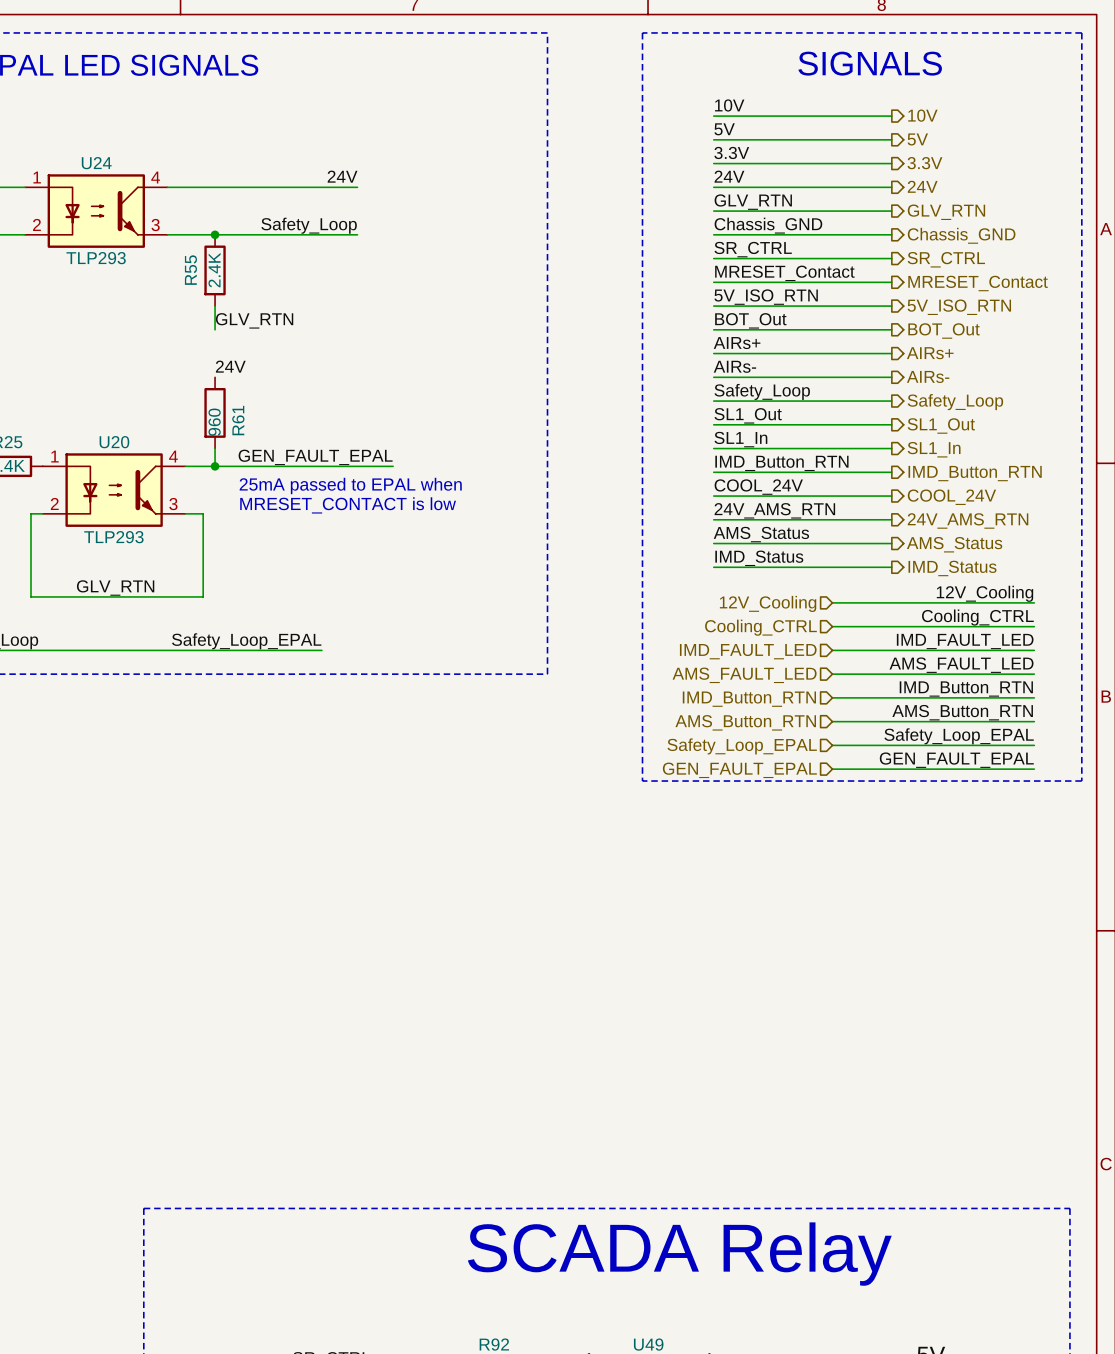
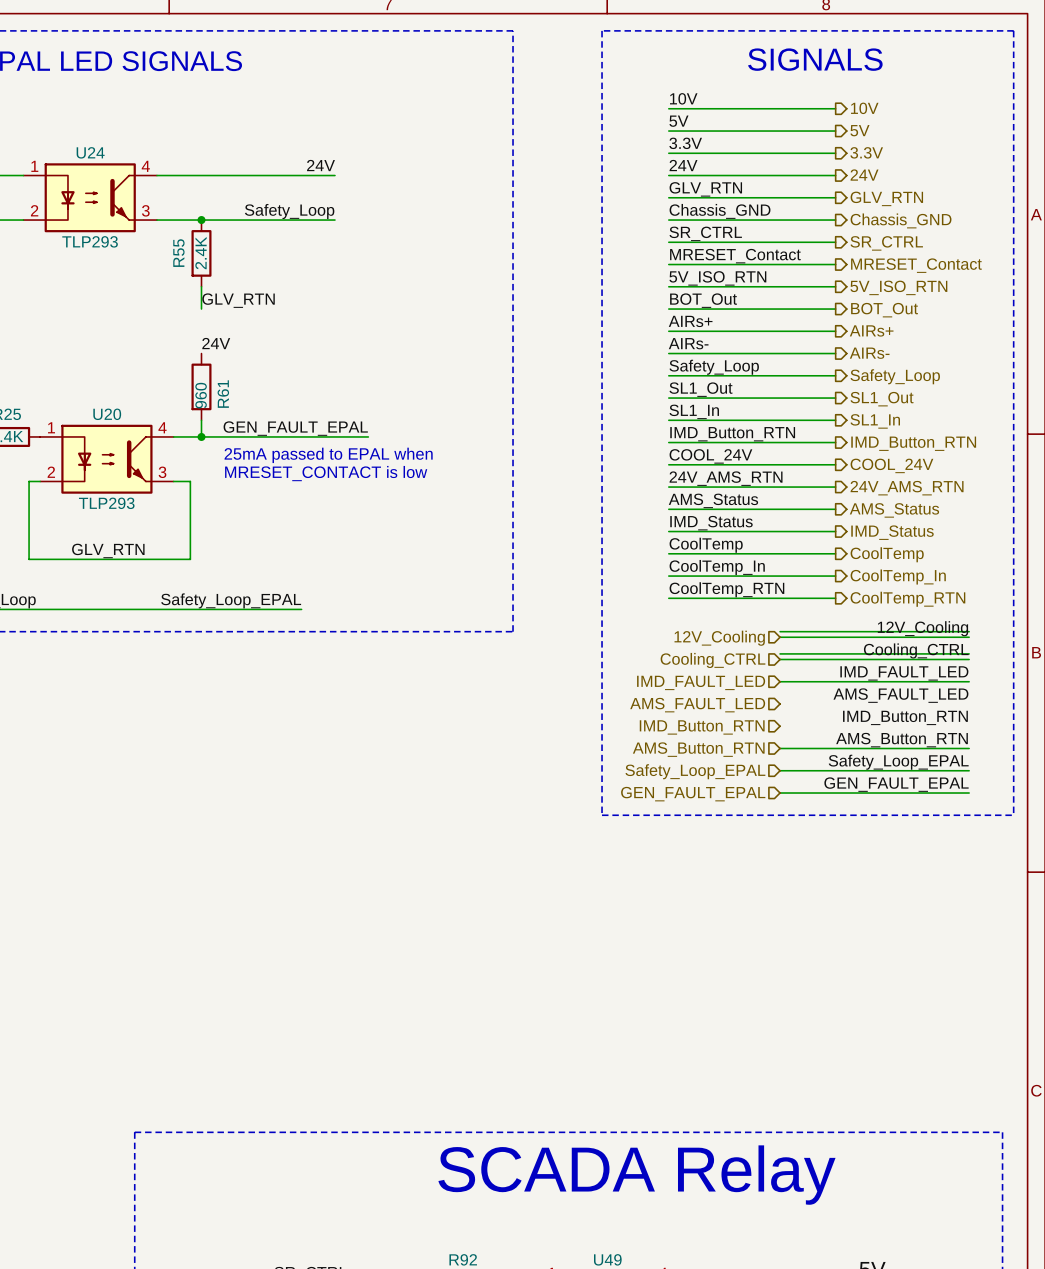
label: none -> CoolTemp (706, 545)
wire: none -> (668, 553) (835, 553)
hierarchical label: none -> CoolTemp (887, 554)
label position: 12V_Cooling (985, 593) -> 12V_Cooling (922, 628)
wire: (832, 602) (1034, 602) -> (780, 637) (969, 637)
hierarchical label position: 12V_Cooling (768, 603) -> 12V_Cooling (719, 638)
label: none -> CoolTemp_In (717, 567)
wire: none -> (668, 576) (835, 576)
hierarchical label: none -> CoolTemp_In (898, 577)
label position: Cooling_CTRL (977, 617) -> Cooling_CTRL (916, 650)
wire: (832, 626) (1034, 626) -> (780, 659) (969, 659)
hierarchical label position: Cooling_CTRL (760, 627) -> Cooling_CTRL (713, 660)
label: none -> CoolTemp_RTN (726, 589)
wire: none -> (668, 598) (835, 598)
hierarchical label: none -> CoolTemp_RTN (907, 599)
label position: IMD_FAULT_LED (965, 641) -> IMD_FAULT_LED (904, 673)
wire: (832, 650) (1034, 650) -> (780, 681) (969, 681)
hierarchical label position: IMD_FAULT_LED (748, 651) -> IMD_FAULT_LED (701, 682)
label position: AMS_FAULT_LED (961, 665) -> AMS_FAULT_LED (900, 695)
hierarchical label position: AMS_FAULT_LED (744, 675) -> AMS_FAULT_LED (697, 705)
label position: IMD_Button_RTN (966, 689) -> IMD_Button_RTN (905, 717)
hierarchical label position: IMD_Button_RTN (749, 699) -> IMD_Button_RTN (702, 727)
label position: AMS_Button_RTN (962, 712) -> AMS_Button_RTN (902, 740)
wire: (832, 721) (1034, 721) -> (780, 748) (969, 748)
hierarchical label position: AMS_Button_RTN (745, 722) -> AMS_Button_RTN (698, 749)
label position: Safety_Loop_EPAL (959, 736) -> Safety_Loop_EPAL (898, 762)
wire: (832, 745) (1034, 745) -> (780, 770) (969, 770)
hierarchical label position: Safety_Loop_EPAL (742, 746) -> Safety_Loop_EPAL (695, 771)
label position: GEN_FAULT_EPAL (956, 760) -> GEN_FAULT_EPAL (896, 784)
wire: (832, 769) (1034, 769) -> (780, 793) (969, 793)
hierarchical label position: GEN_FAULT_EPAL (739, 770) -> GEN_FAULT_EPAL (693, 794)
line: (642, 781) (1081, 781) -> (602, 731) (602, 815) (1013, 815) (1013, 731)

